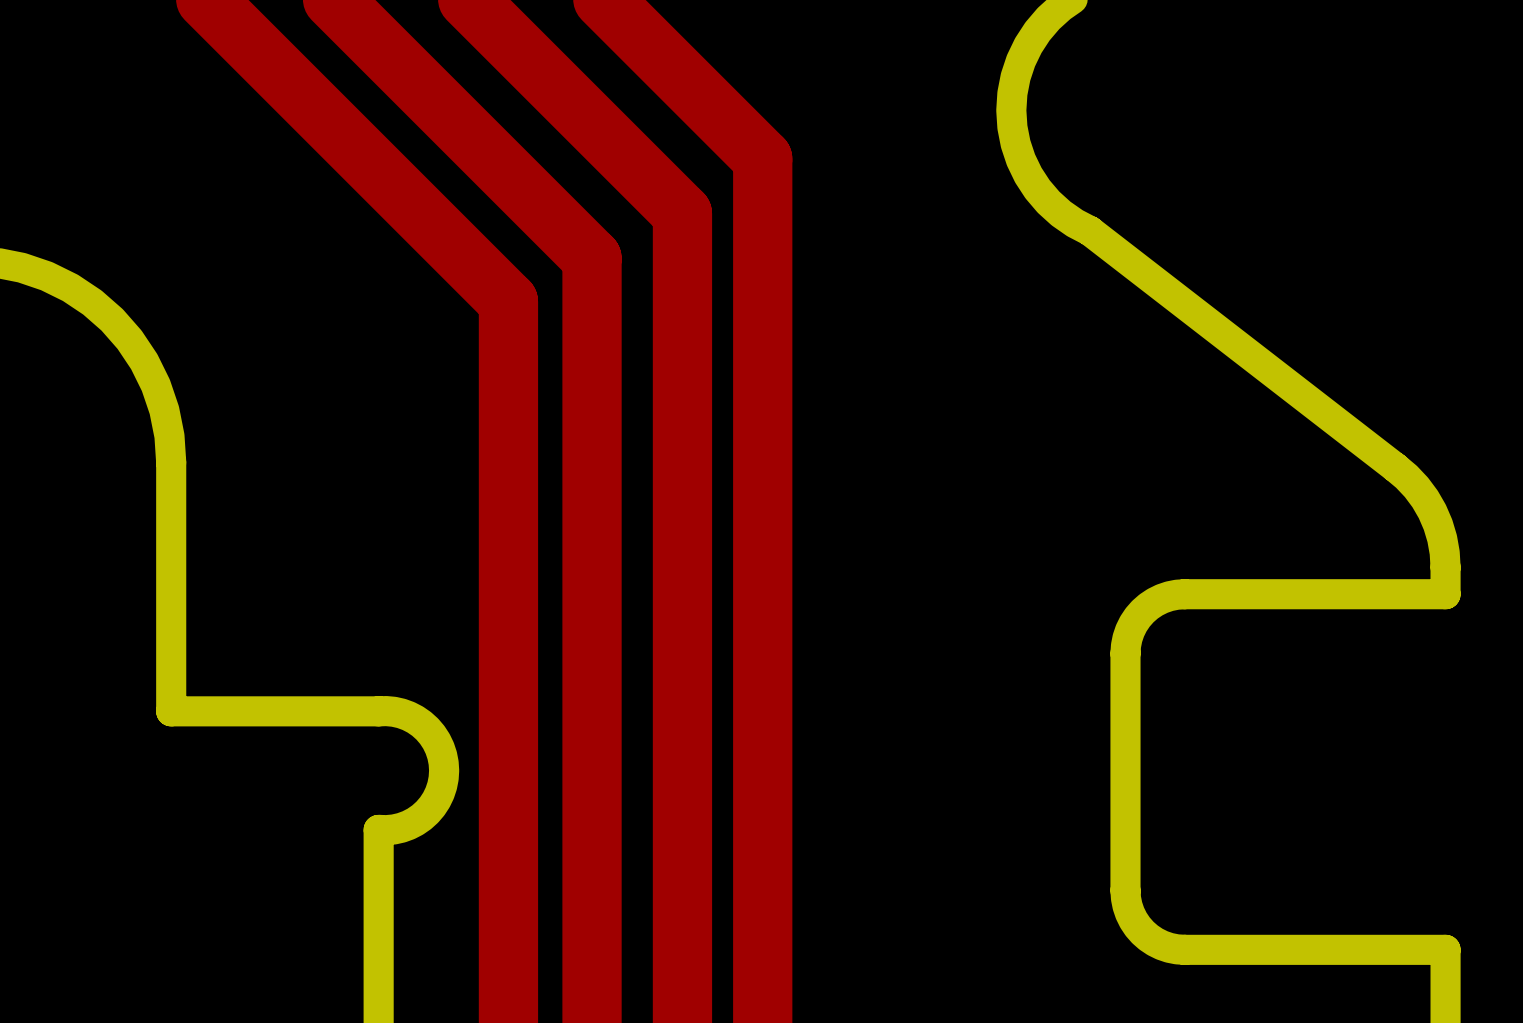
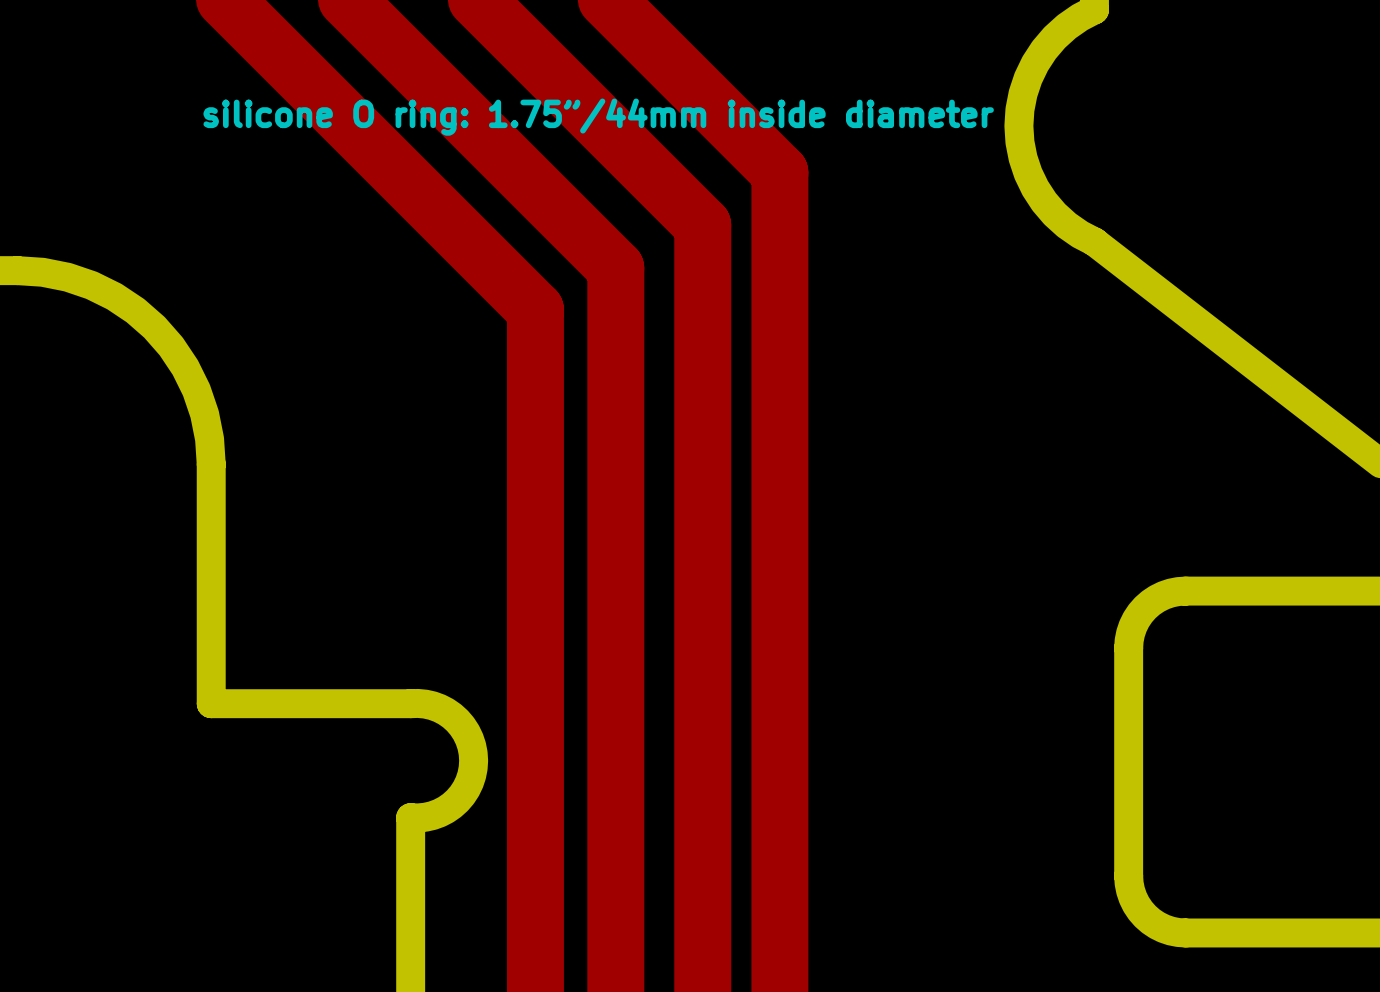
text: none -> silicone O ring: 1.75”/44mm inside diameter (598, 117)

